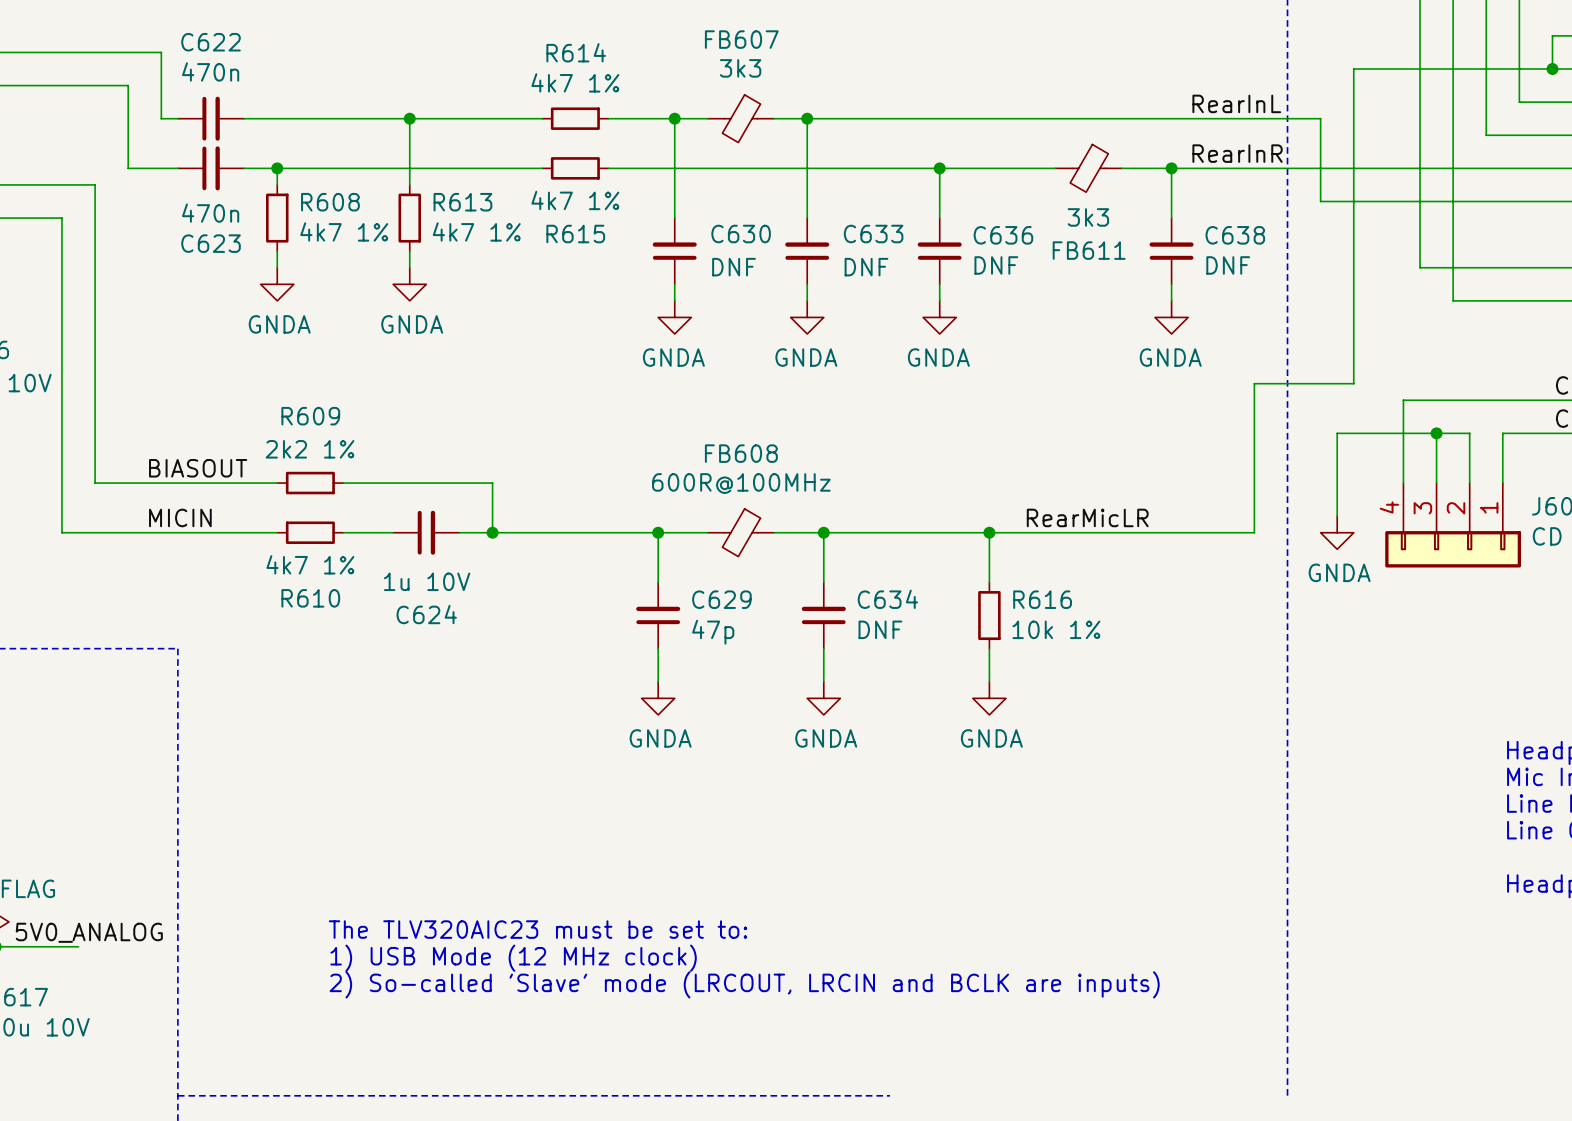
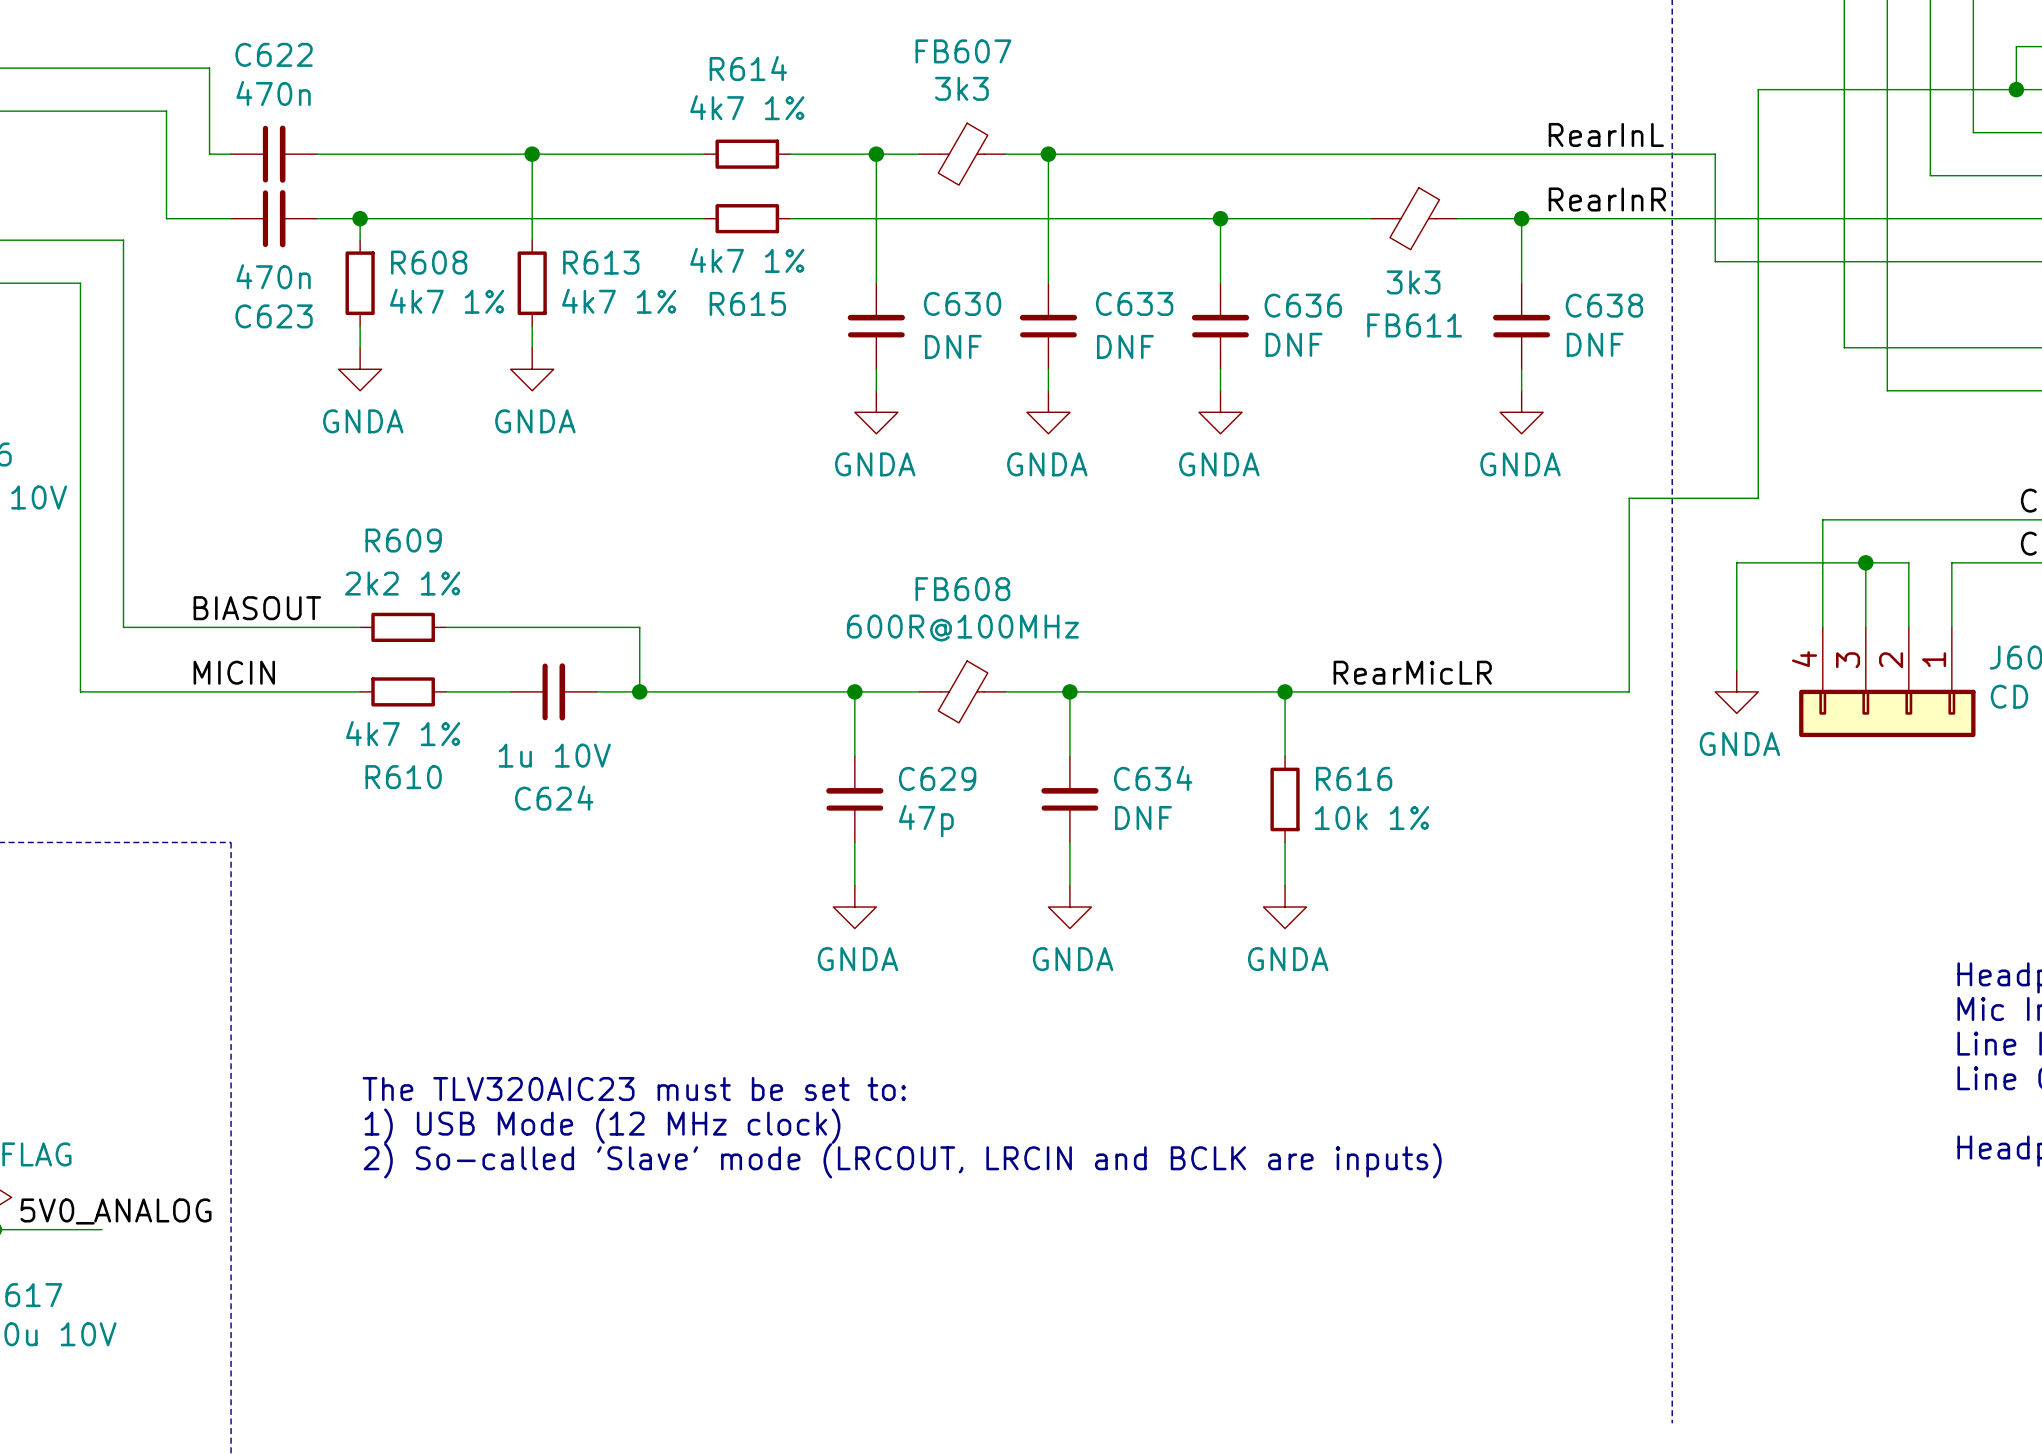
text position: The TLV320AIC23 must be set to: (538, 929) -> The TLV320AIC23 must be set to: (634, 1089)
text position: 1) USB Mode (12 MHz clock) (513, 958) -> 1) USB Mode (12 MHz clock) (602, 1126)
text position: 2) So-called 'Slave' mode (LRCOUT, LRCIN and BCLK are inputs) (744, 984) -> 2) So-called 'Slave' mode (LRCOUT, LRCIN and BCLK are inputs) (902, 1160)
line: (177, 1095) (890, 1095) -> none

